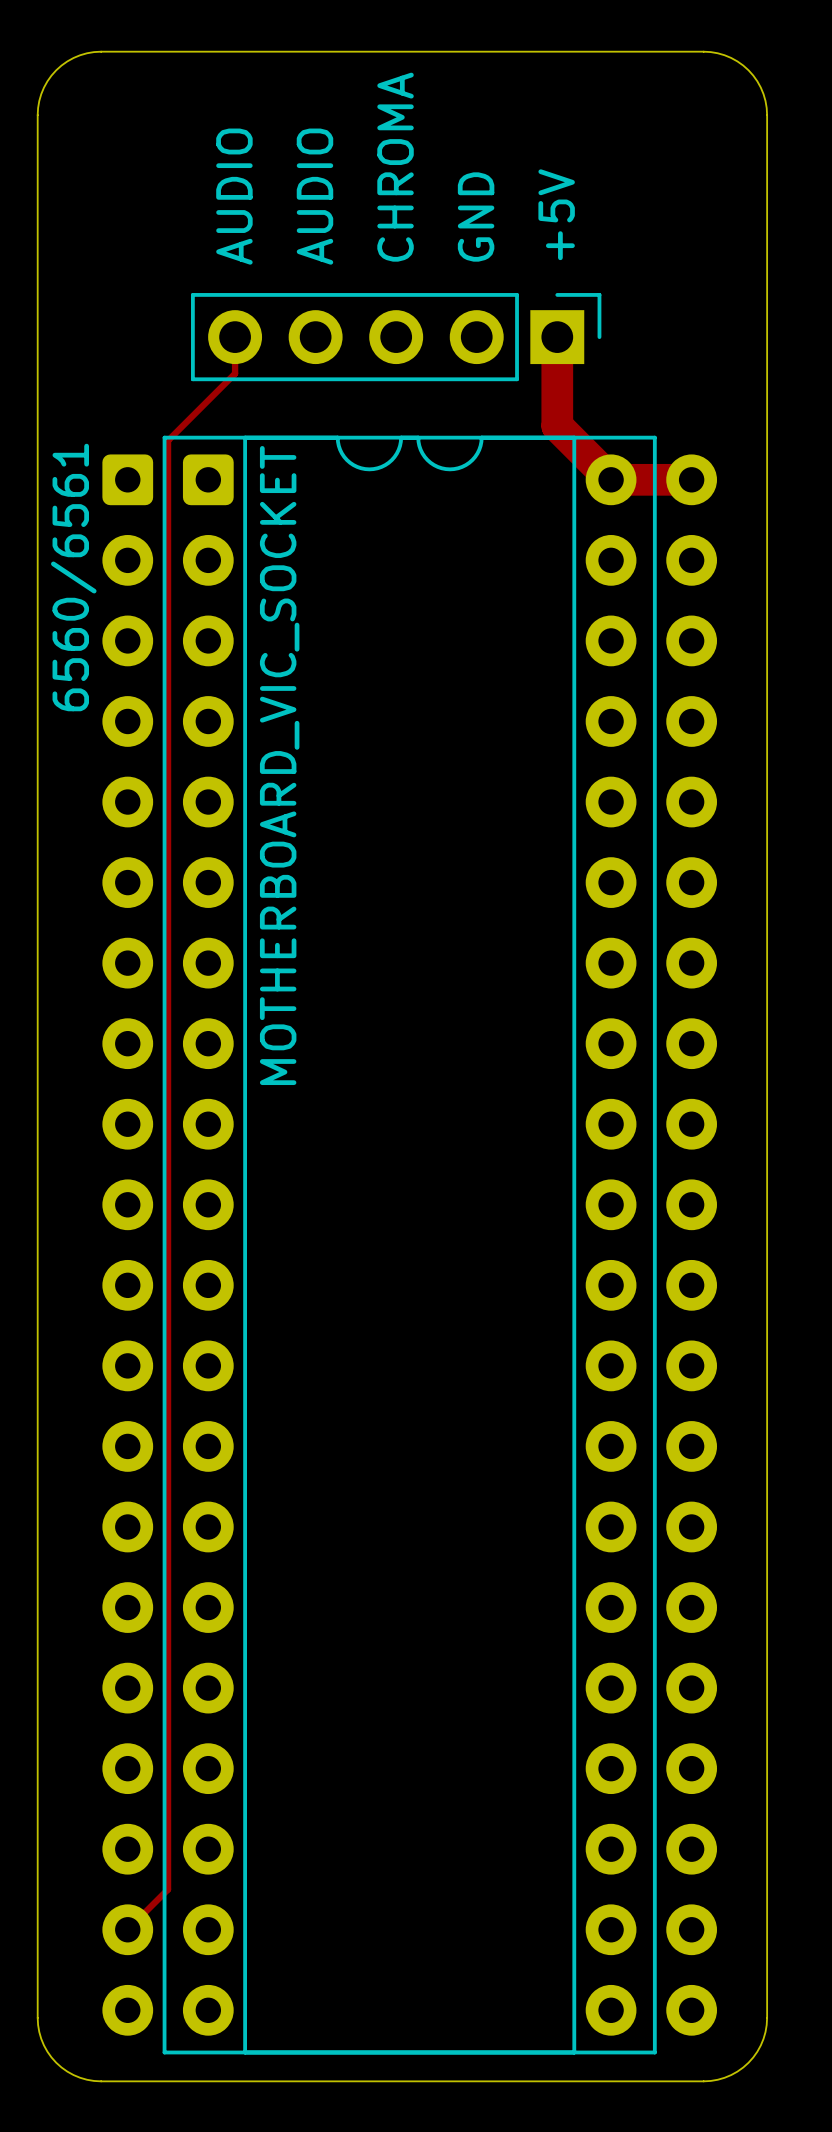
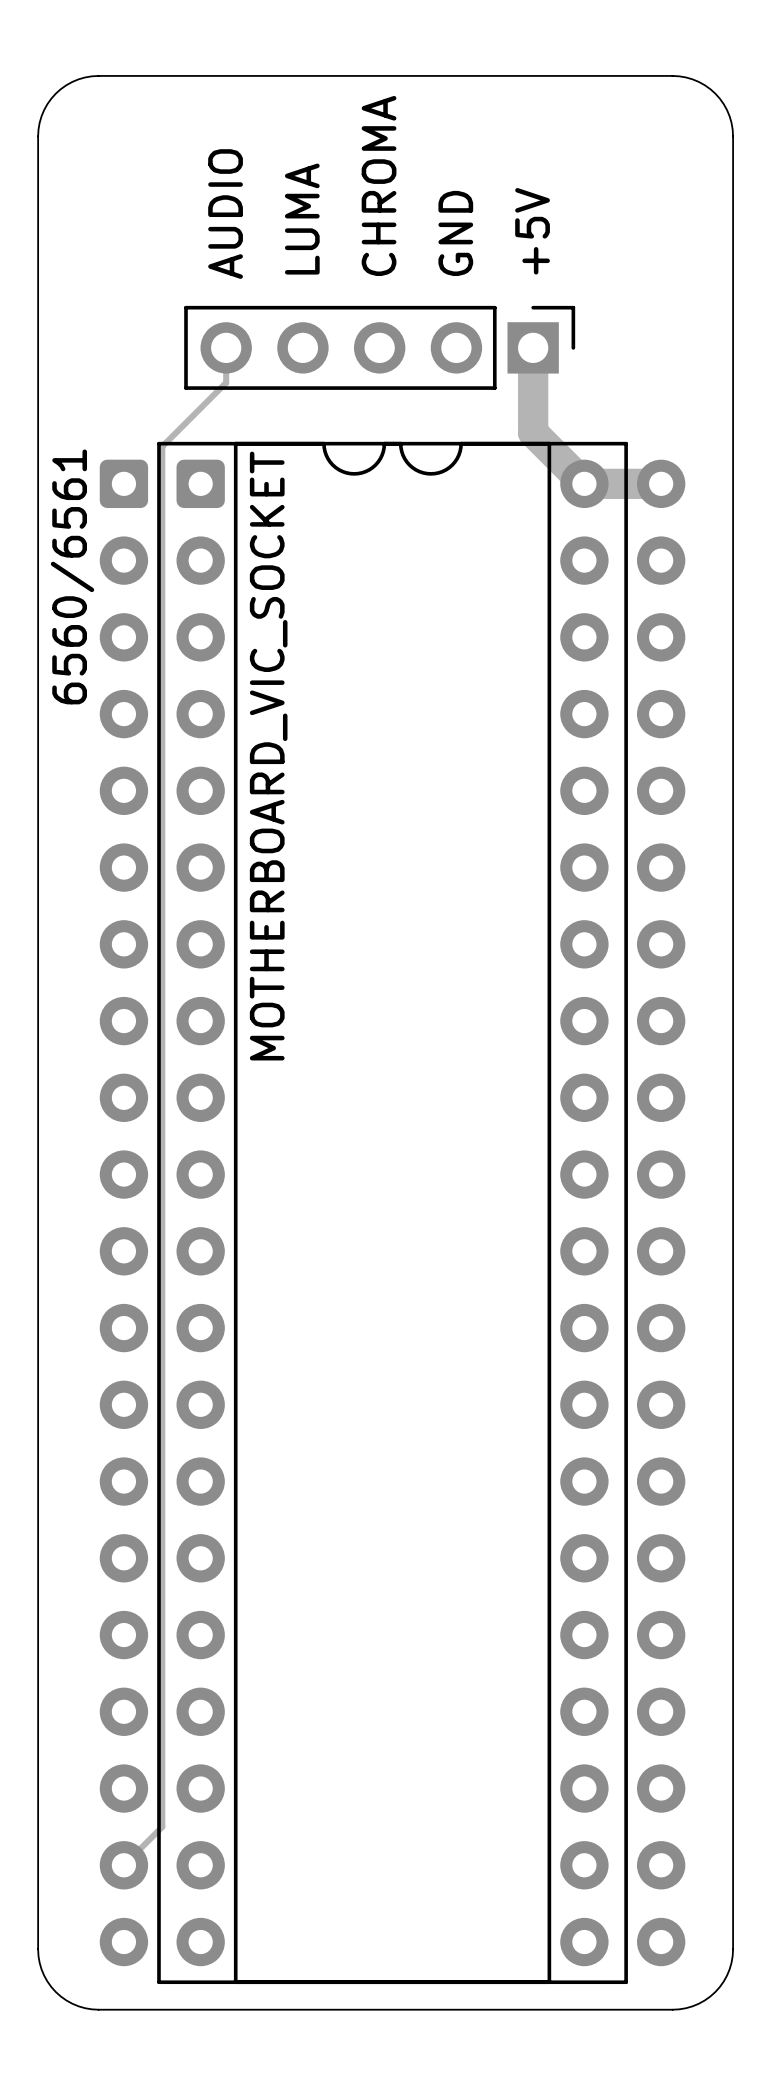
text: AUDIO (314, 196) -> LUMA (302, 219)

